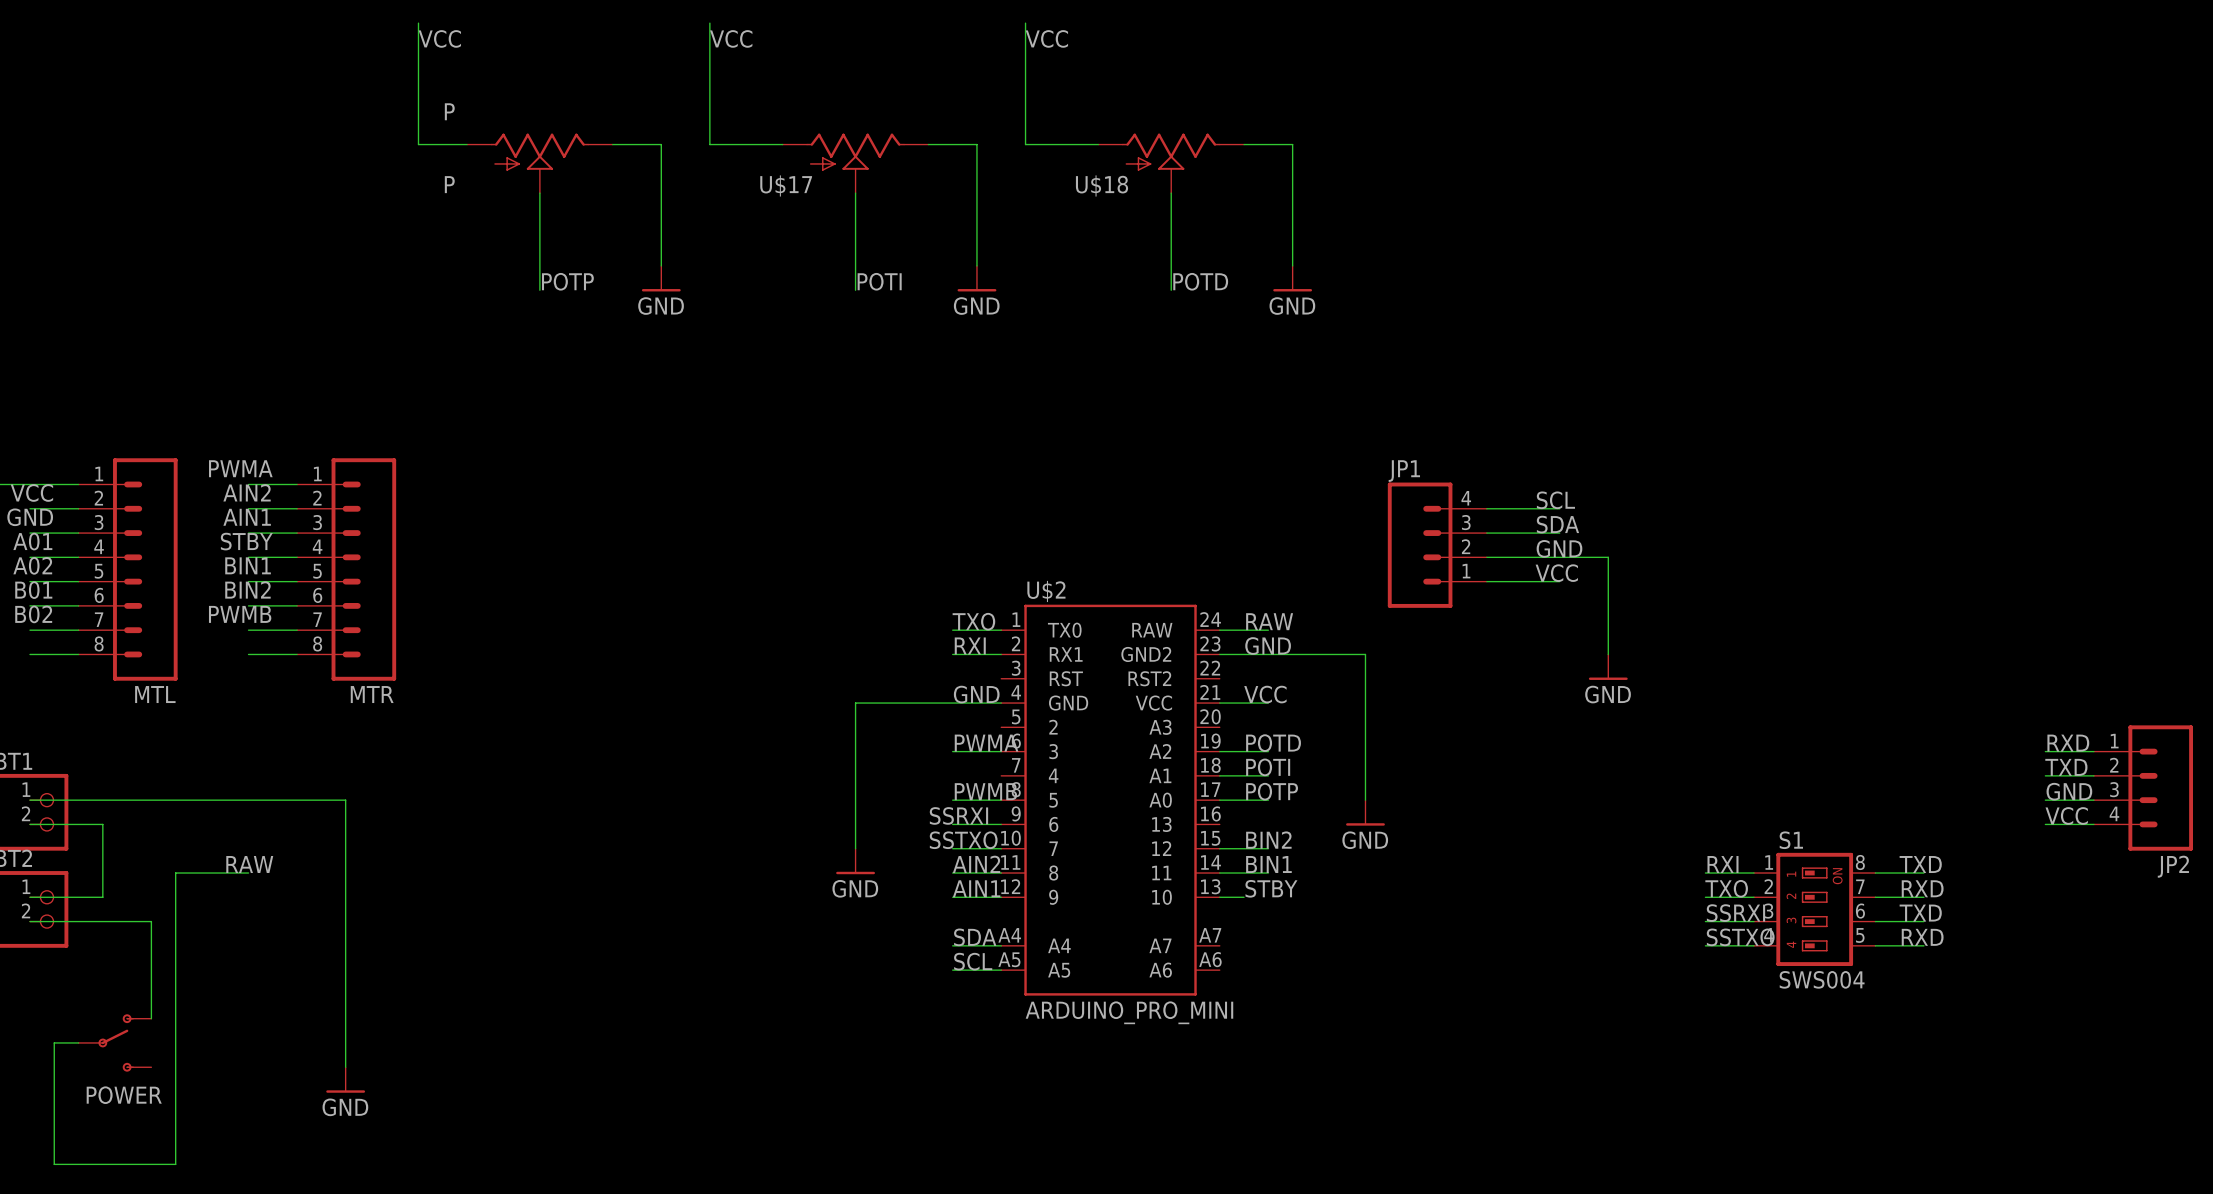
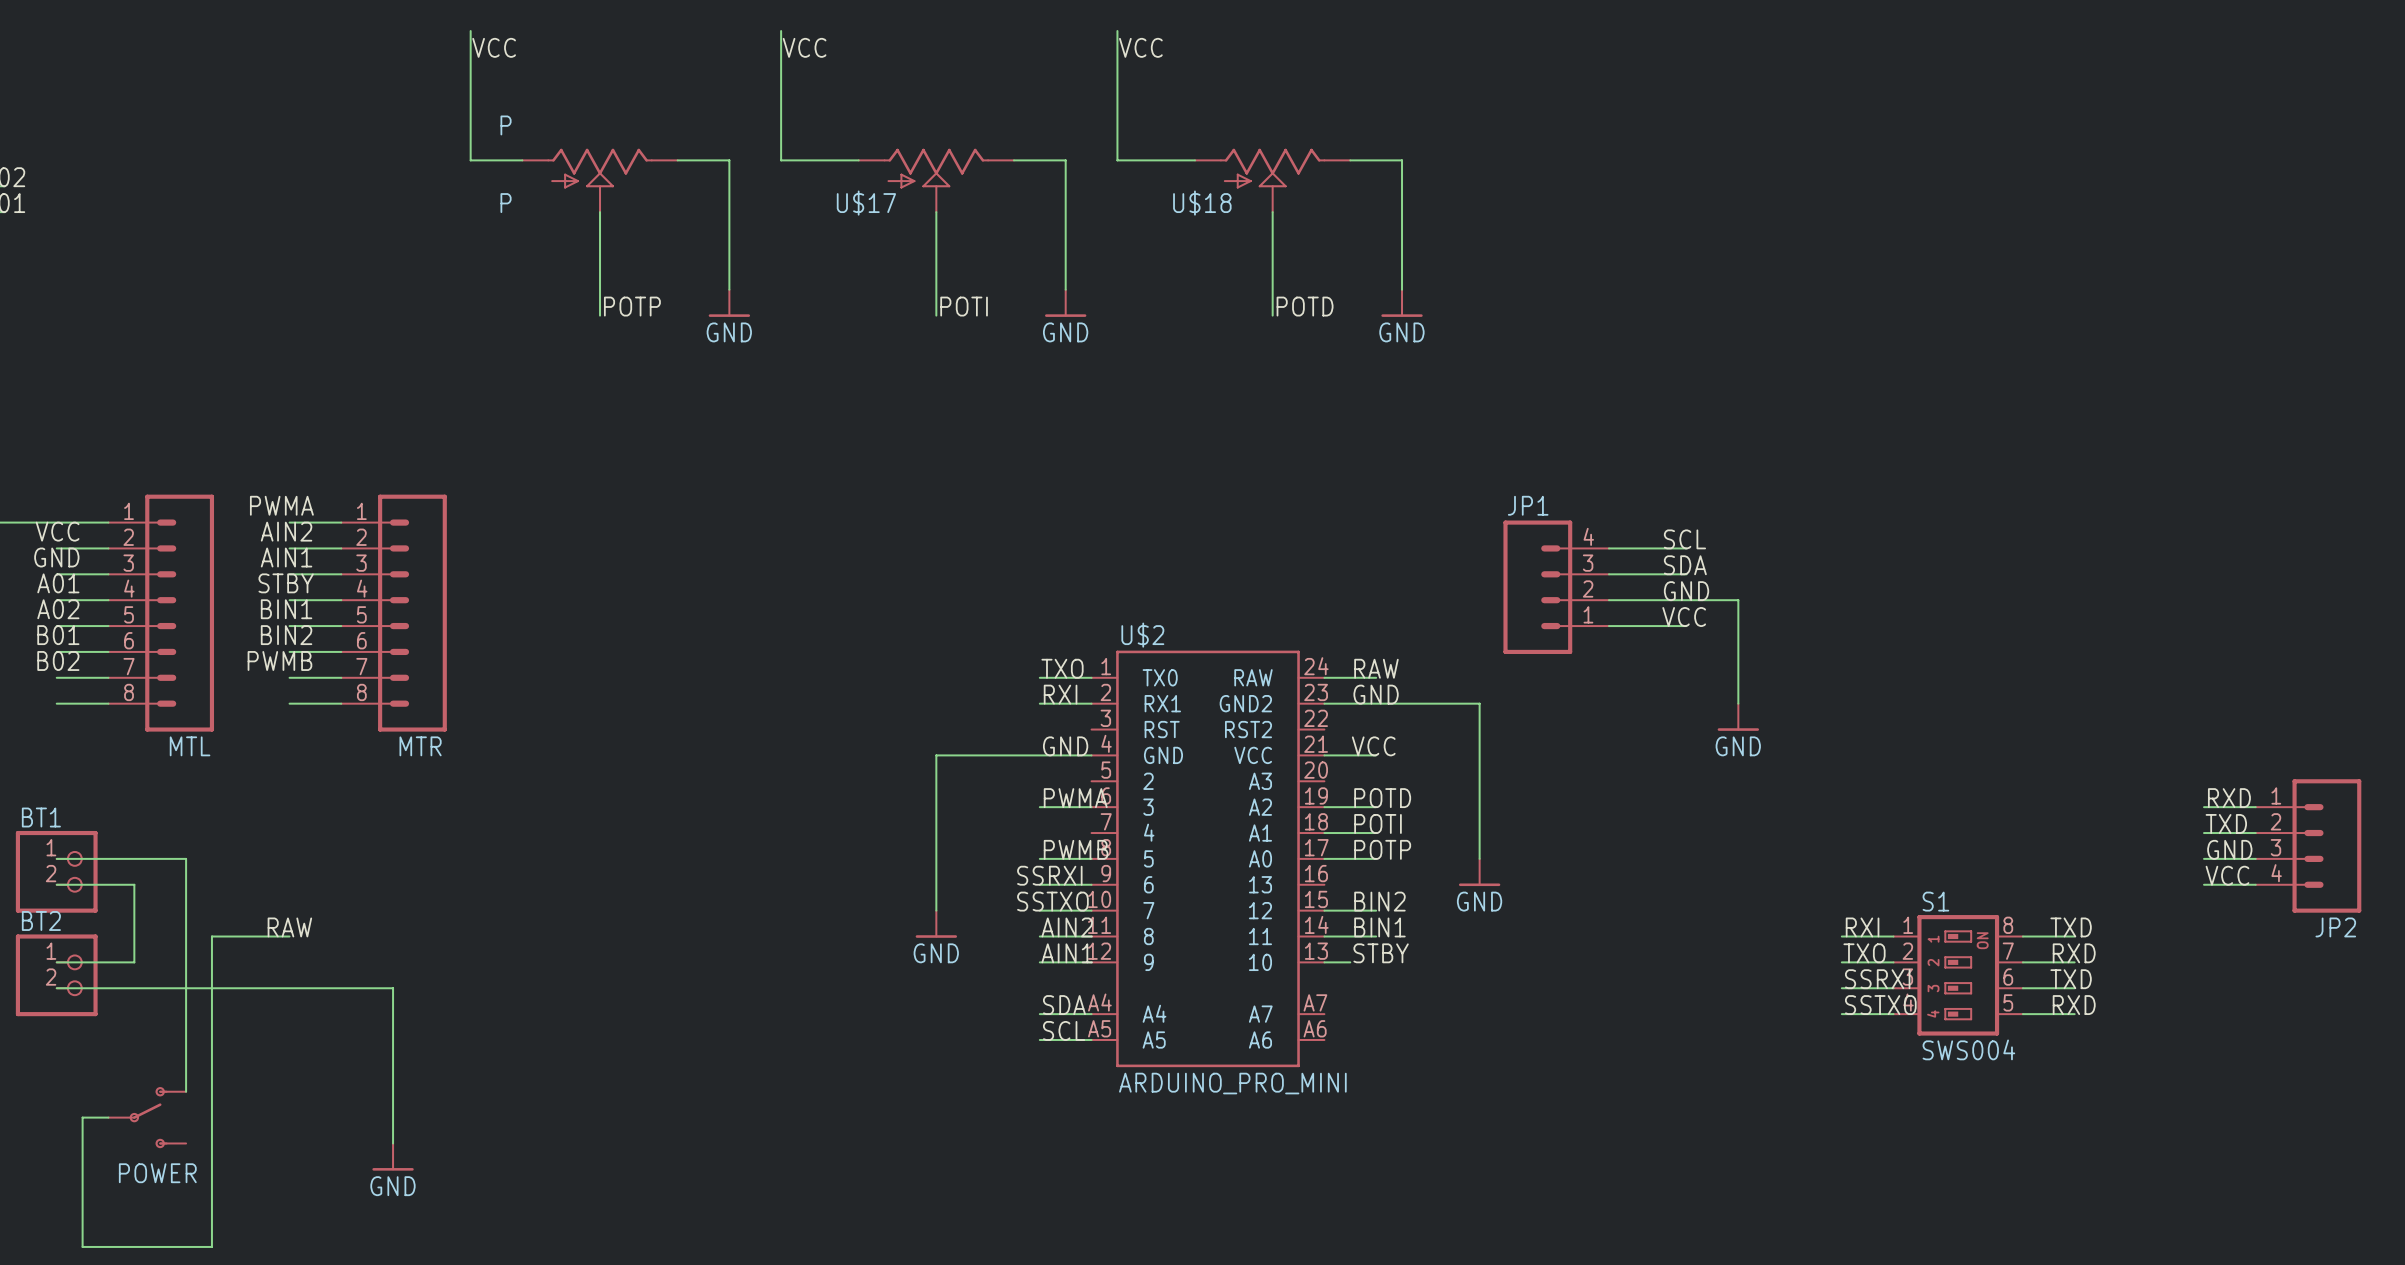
wire: (151, 800) (345, 800) (345, 921) -> (186, 858) (186, 988) (393, 988)

